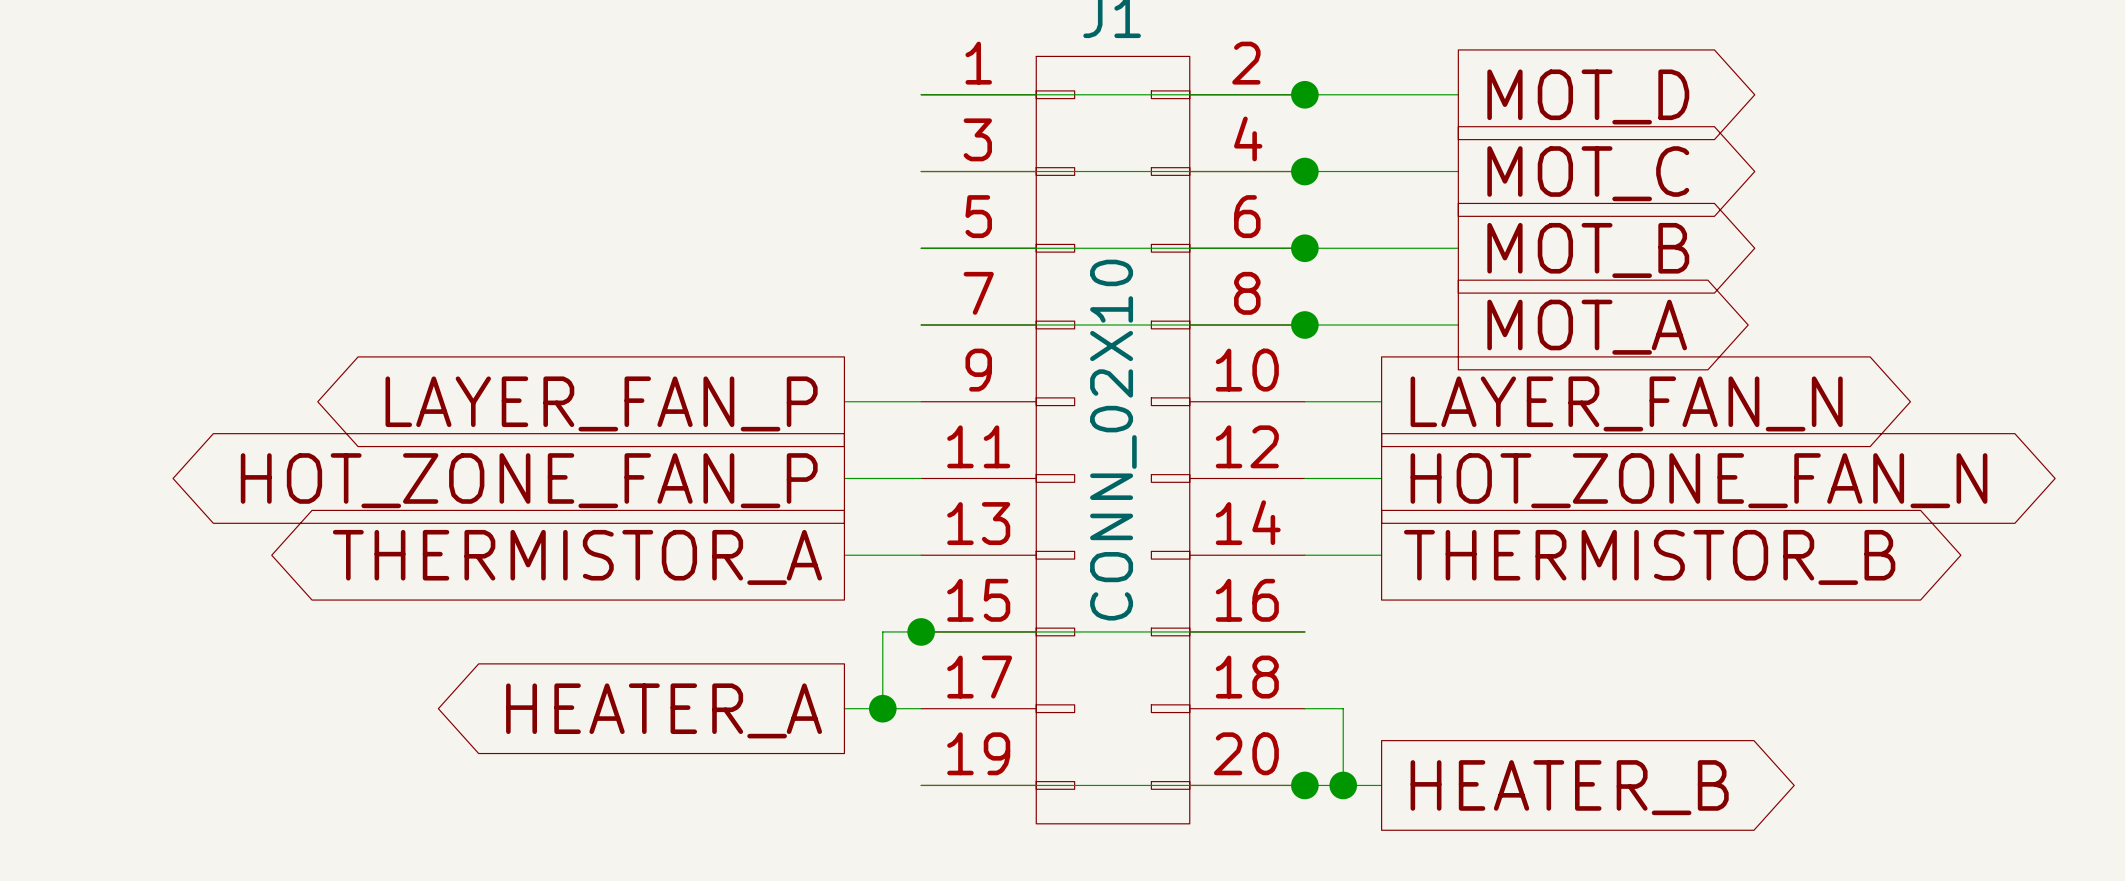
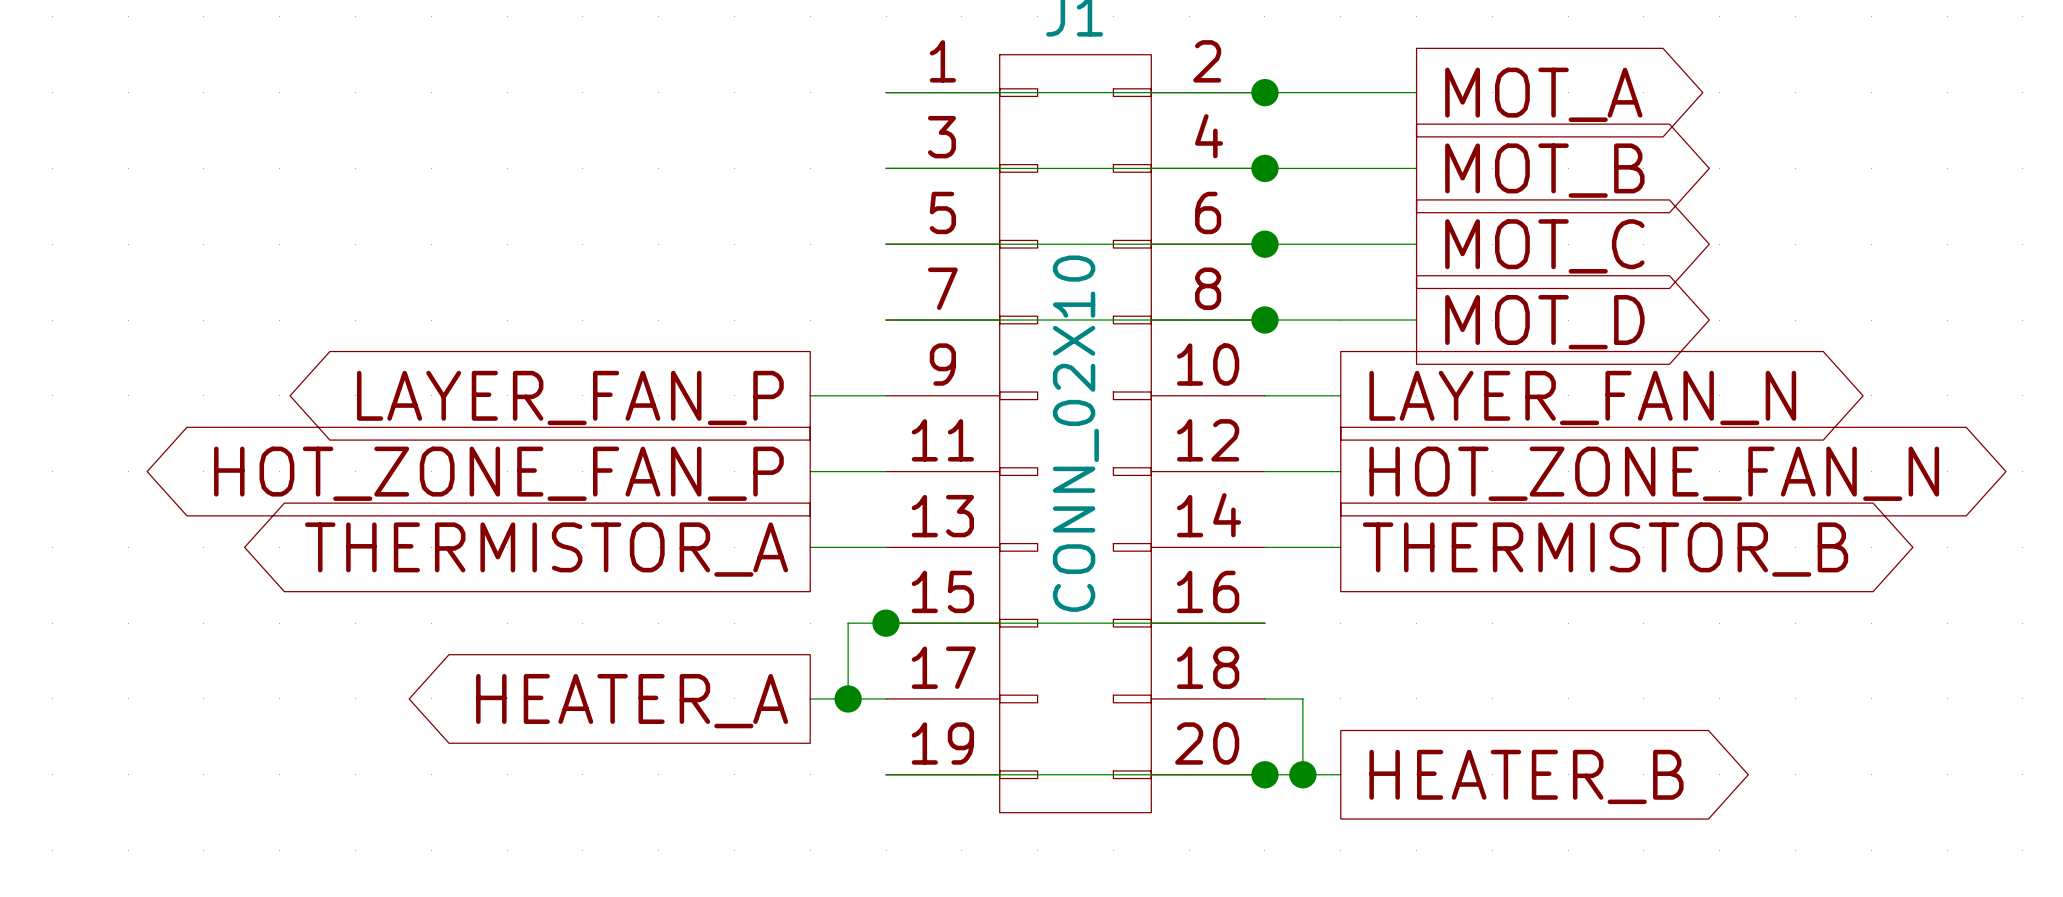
global label: MOT_D (1588, 96) -> MOT_A (1543, 94)
global label: MOT_C (1588, 173) -> MOT_B (1544, 170)
global label: MOT_B (1588, 250) -> MOT_C (1544, 246)
global label: MOT_A (1587, 327) -> MOT_D (1544, 322)

